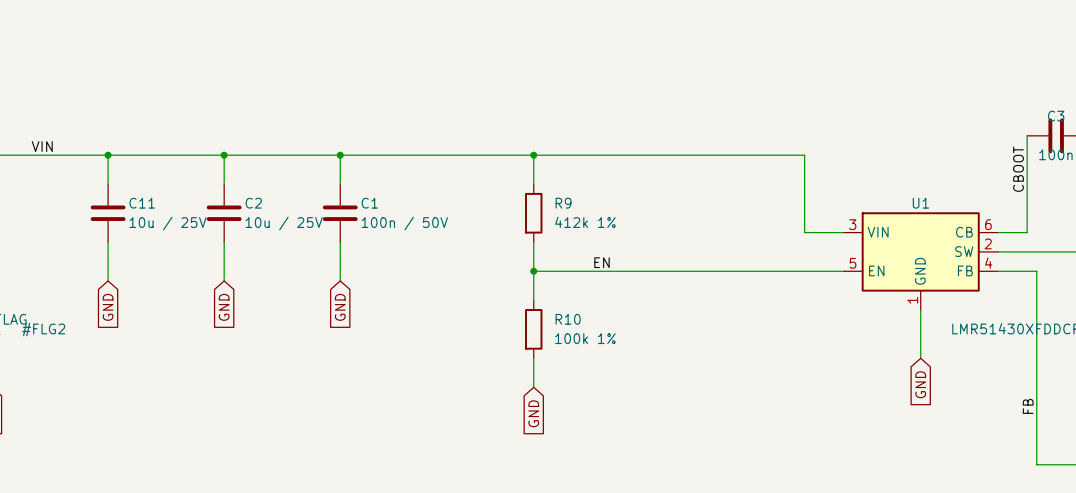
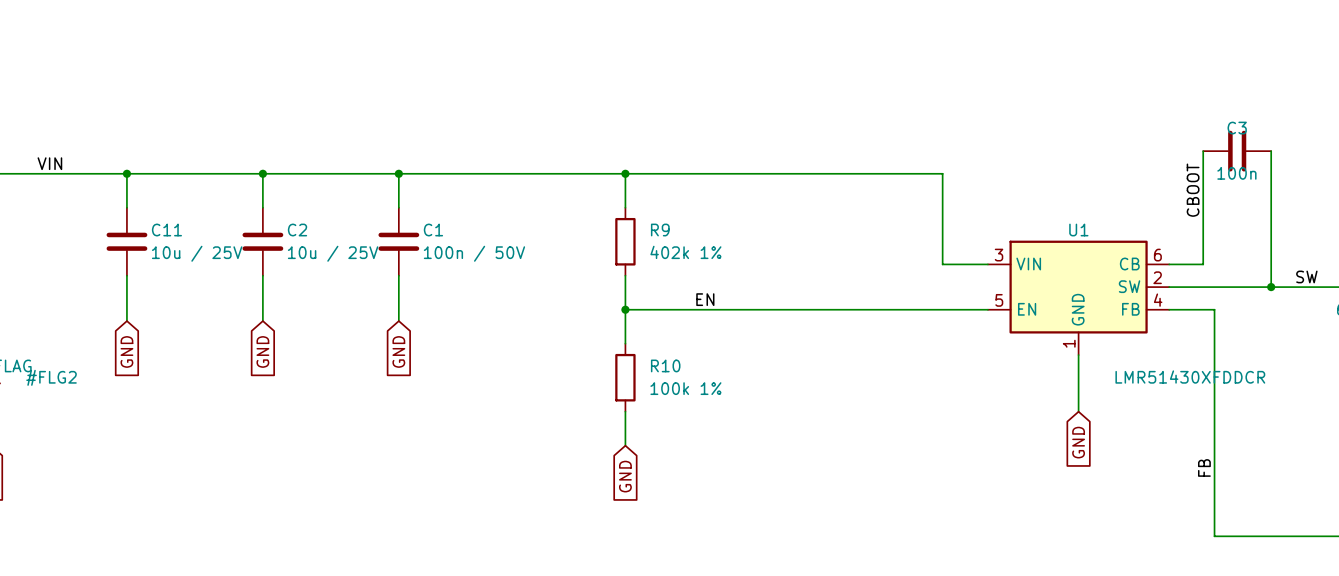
R9 value: 412k 1% (585, 222) -> 402k 1% (685, 252)

